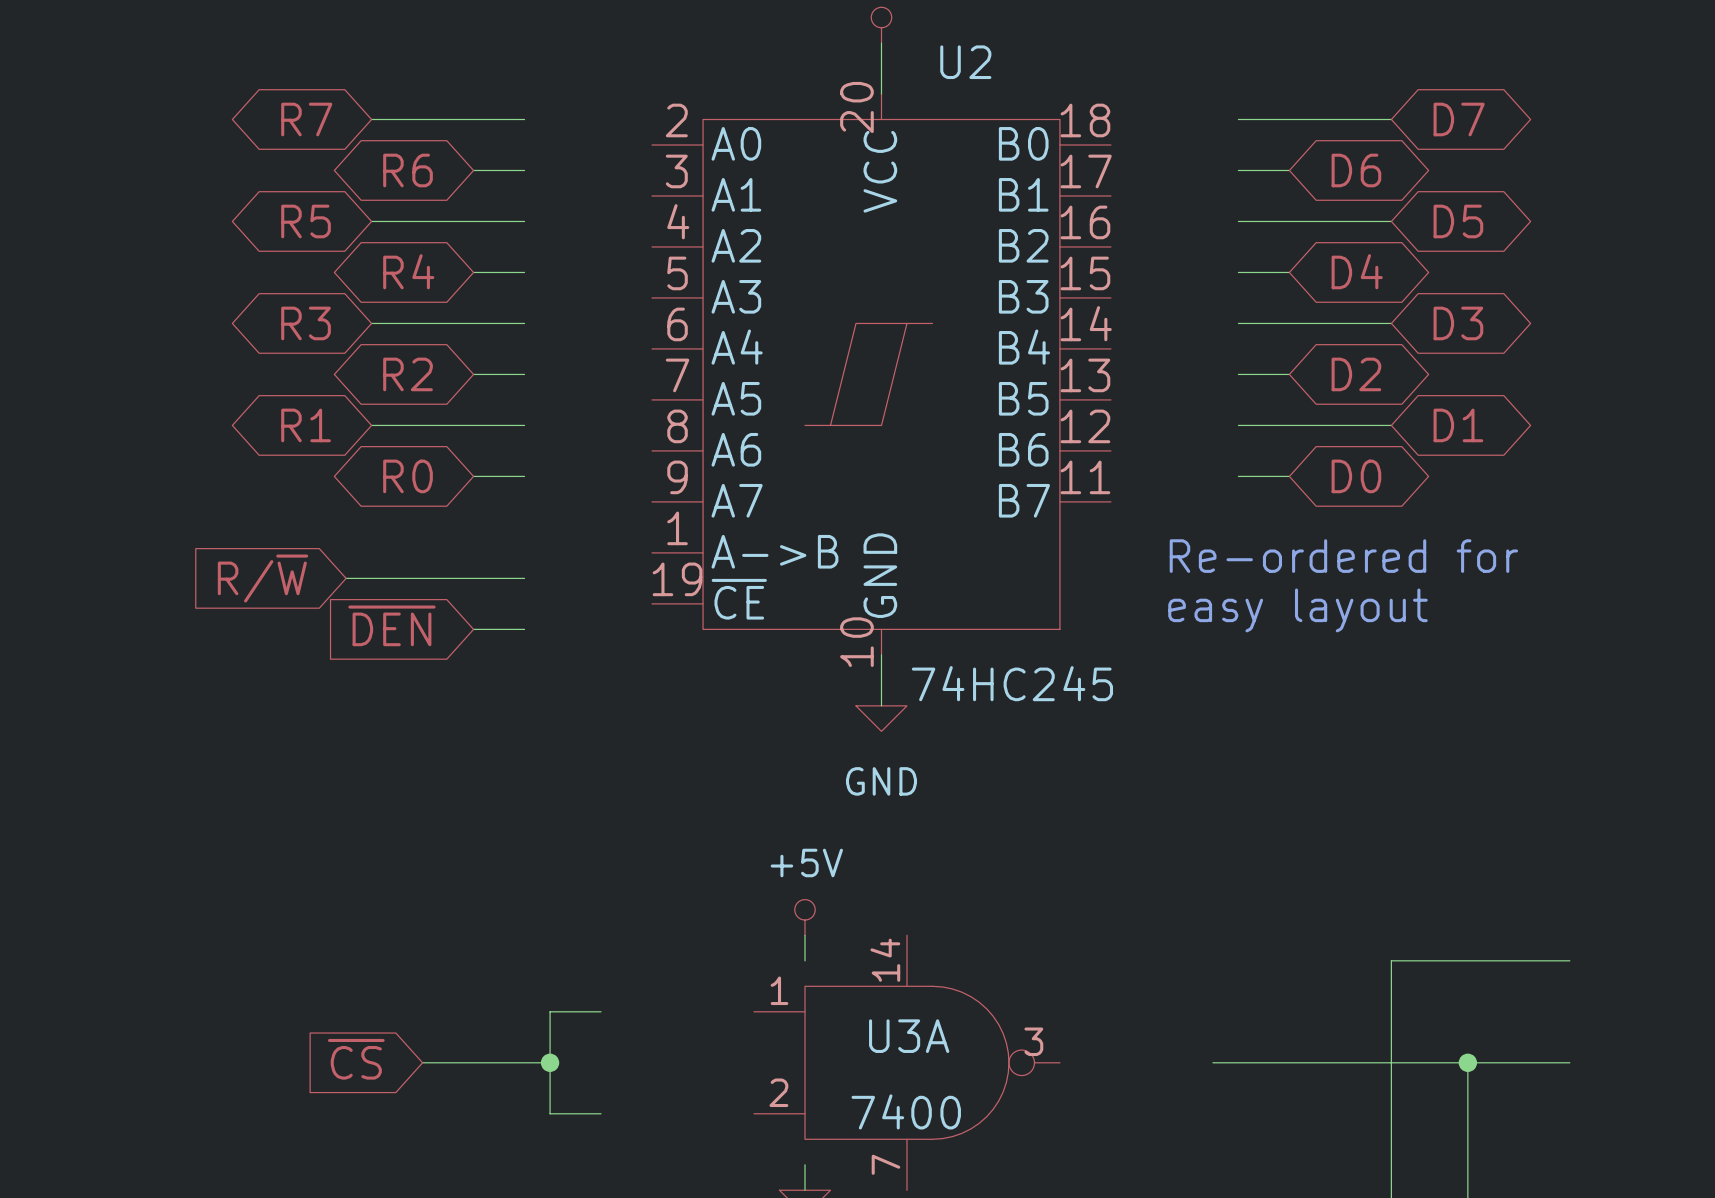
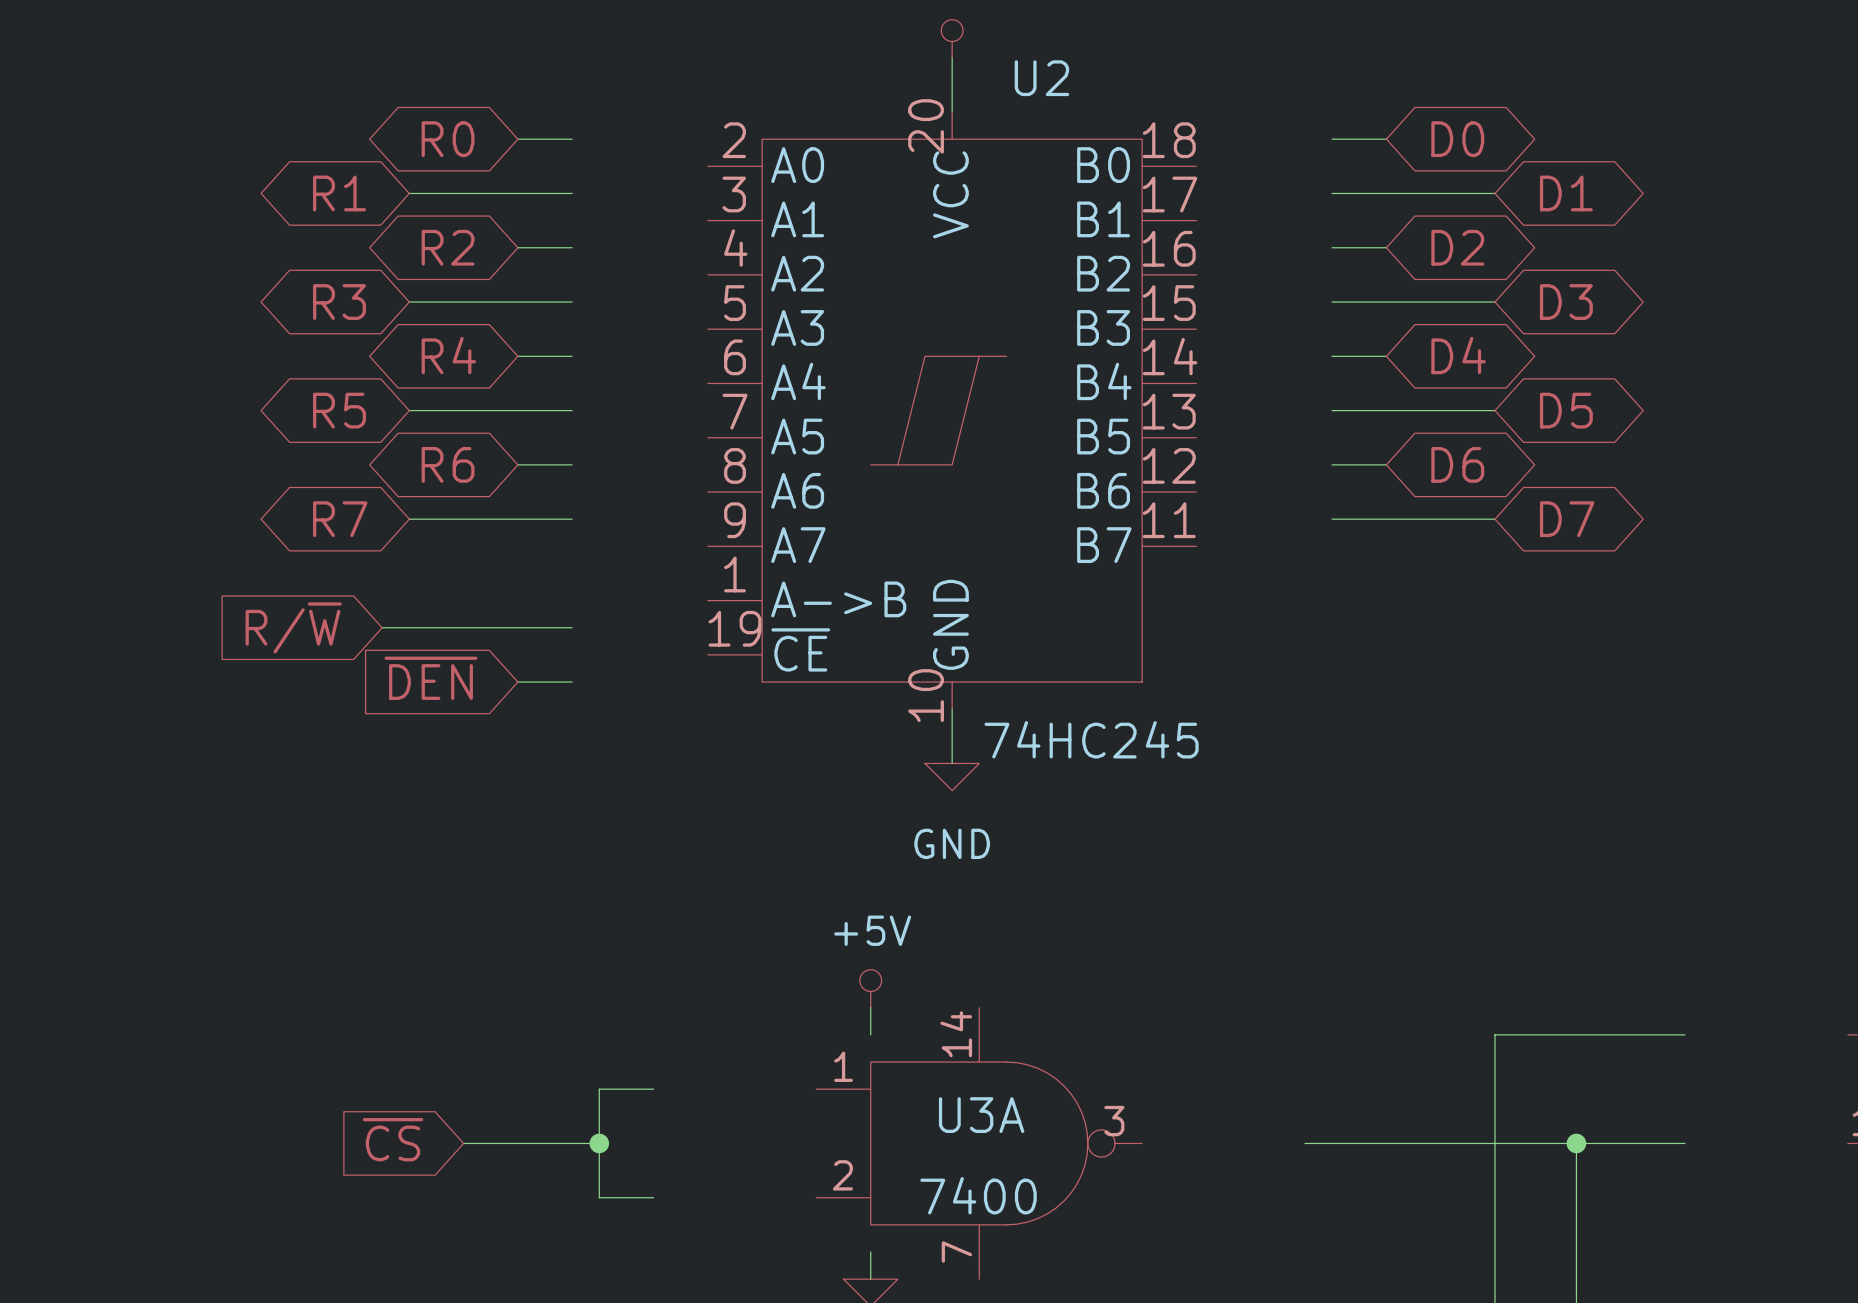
global label position: R7 (306, 119) -> R7 (340, 519)
wire: (371, 119) (473, 119) -> (409, 193) (517, 193)
wire: (1289, 119) (1391, 119) -> (1386, 193) (1495, 193)
global label position: D7 (1459, 119) -> D7 (1567, 519)
global label position: R6 (408, 170) -> R6 (448, 464)
global label position: D6 (1356, 170) -> D6 (1457, 464)
global label position: R5 (306, 221) -> R5 (339, 410)
wire: (371, 221) (473, 221) -> (409, 302) (517, 302)
wire: (1289, 221) (1391, 221) -> (1386, 302) (1495, 302)
global label position: D5 (1458, 221) -> D5 (1566, 410)
global label position: R4 (408, 271) -> R4 (448, 355)
global label position: D4 (1357, 271) -> D4 (1458, 355)
global label position: R3 (306, 323) -> R3 (339, 302)
wire: (371, 323) (473, 323) -> (409, 410) (517, 410)
wire: (1289, 323) (1391, 323) -> (1386, 410) (1495, 410)
global label position: D3 (1458, 323) -> D3 (1566, 302)
global label position: R2 (408, 374) -> R2 (448, 247)
global label position: D2 (1356, 374) -> D2 (1457, 247)
global label position: R1 (306, 425) -> R1 (339, 193)
wire: (371, 425) (473, 425) -> (409, 519) (517, 519)
wire: (1289, 425) (1391, 425) -> (1386, 519) (1495, 519)
global label position: D1 (1458, 425) -> D1 (1566, 193)
global label position: R0 (408, 476) -> R0 (448, 139)
global label position: D0 (1356, 476) -> D0 (1457, 139)
text: Re-ordered for (1343, 556) -> none
text: easy layout (1297, 610) -> none

